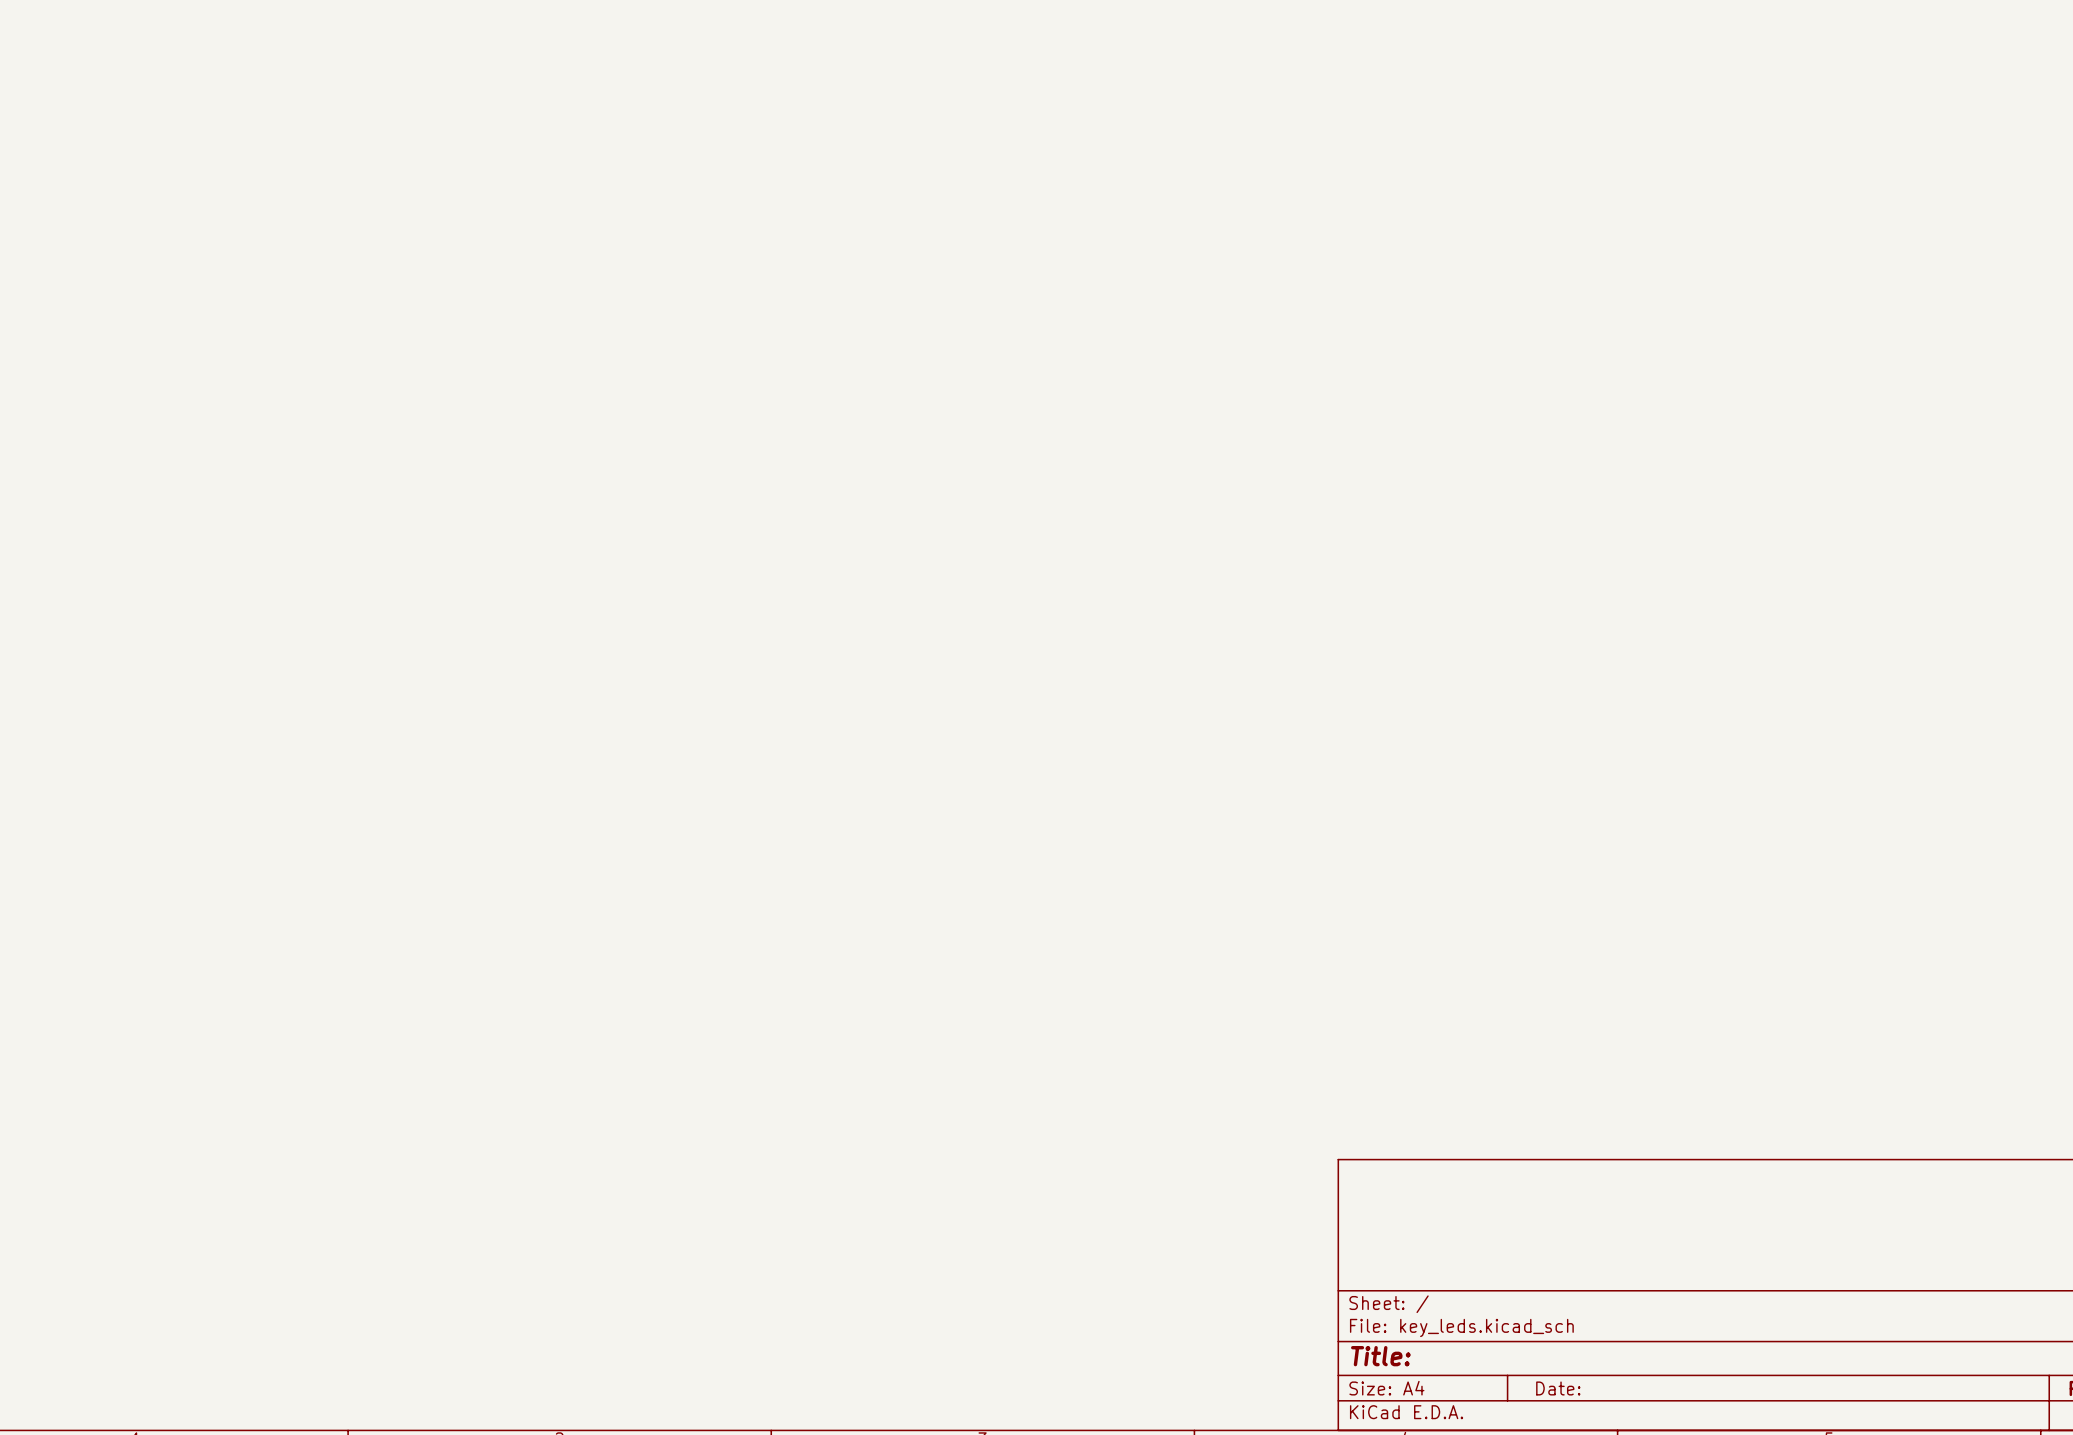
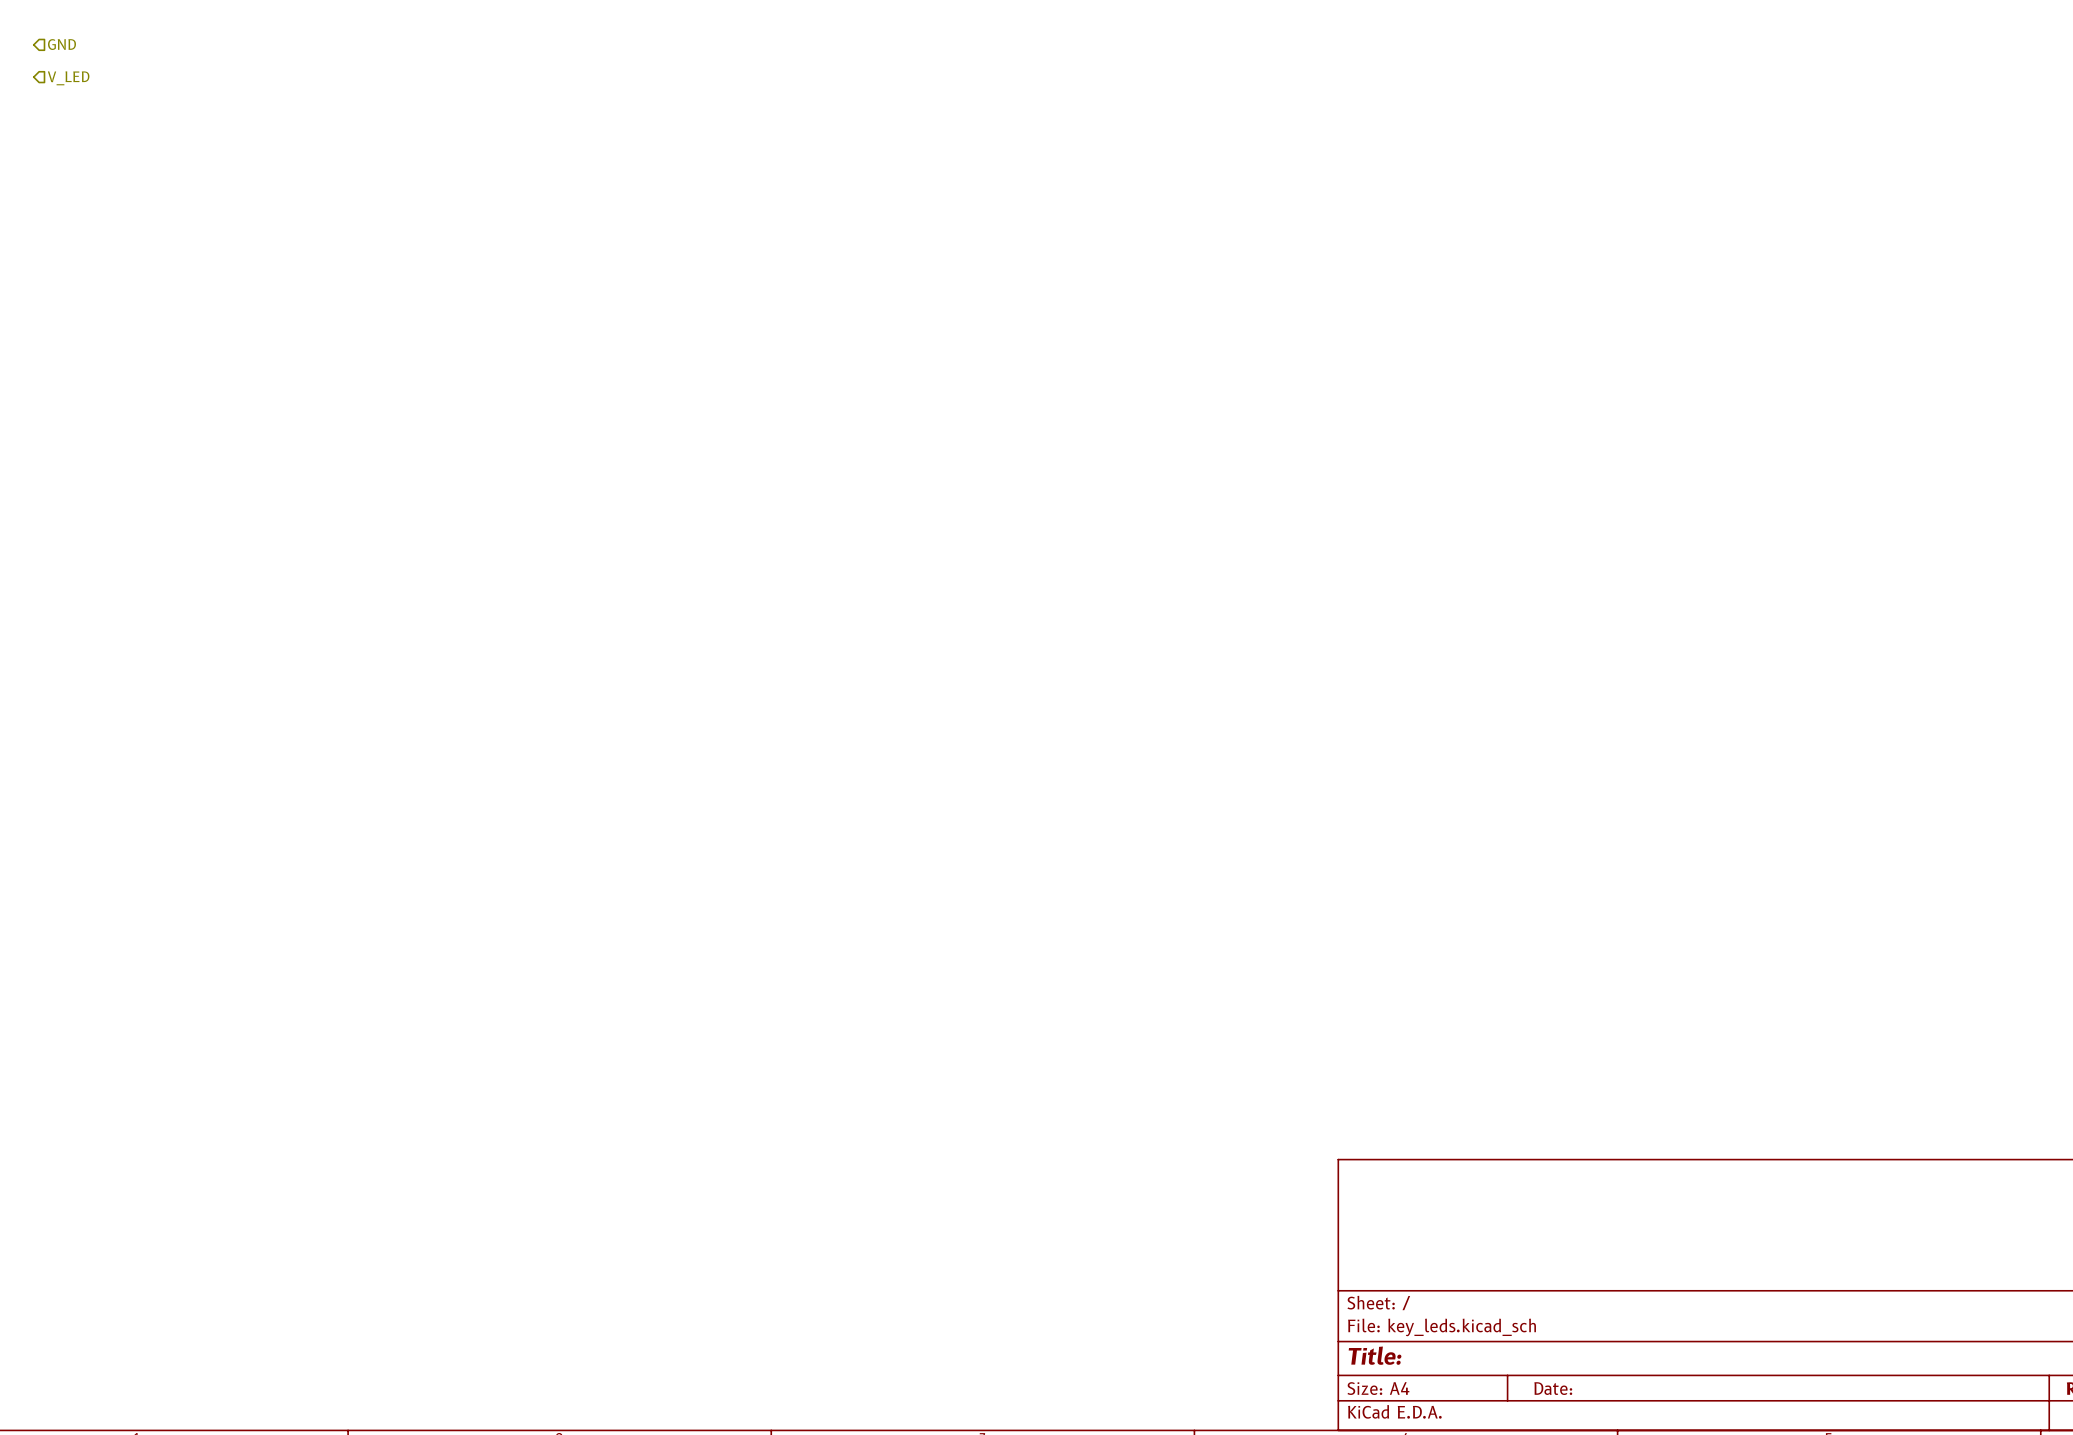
hierarchical label: none -> GND (61, 44)
hierarchical label: none -> V_LED (68, 78)

